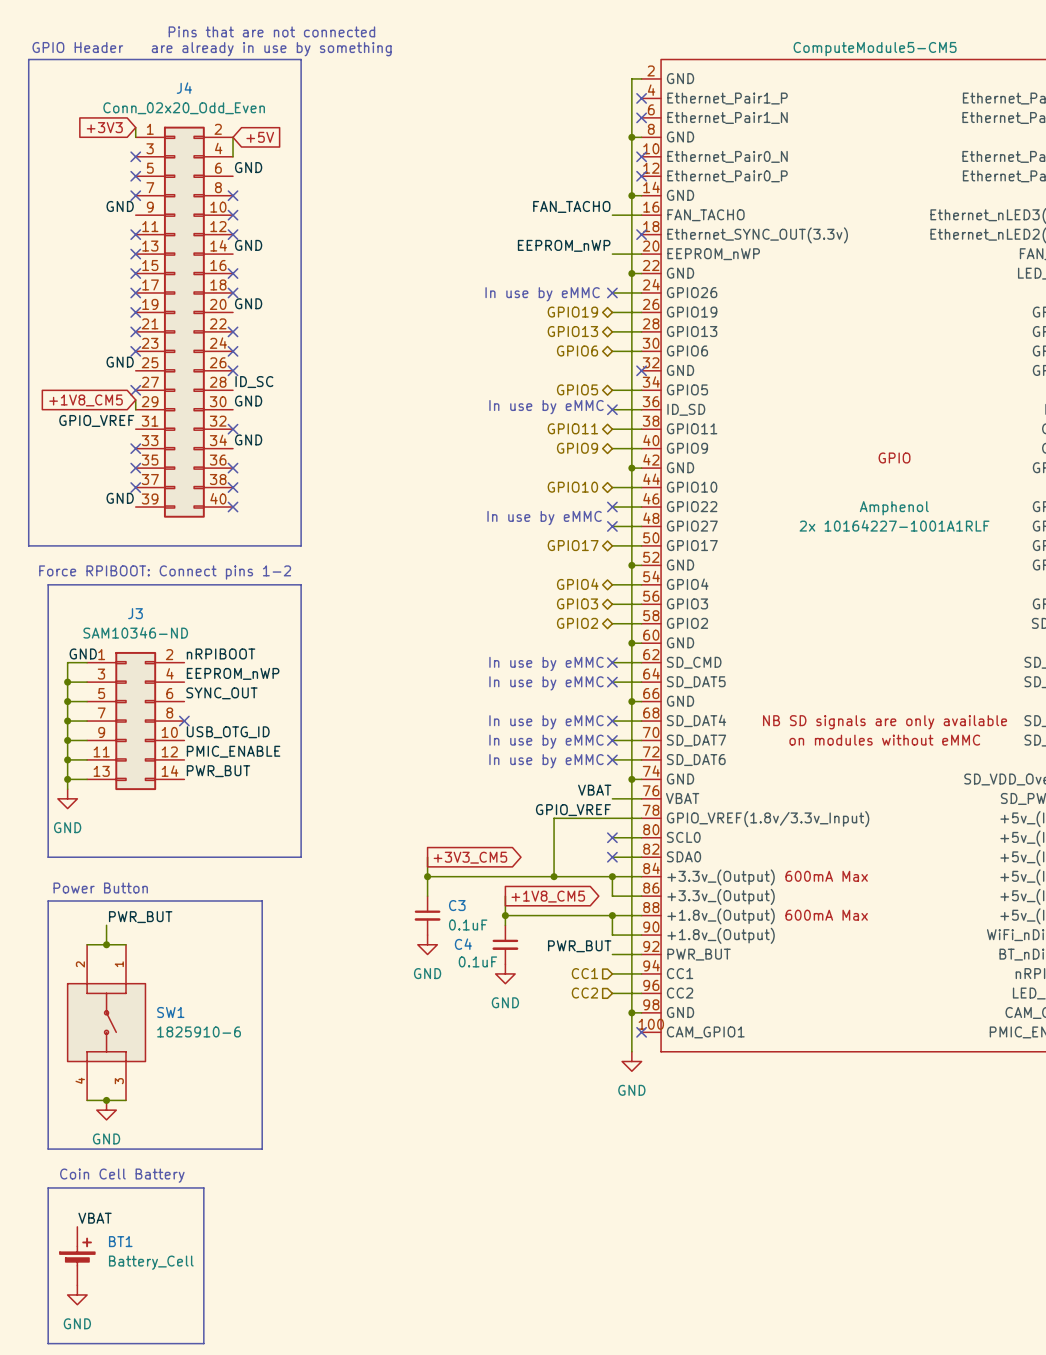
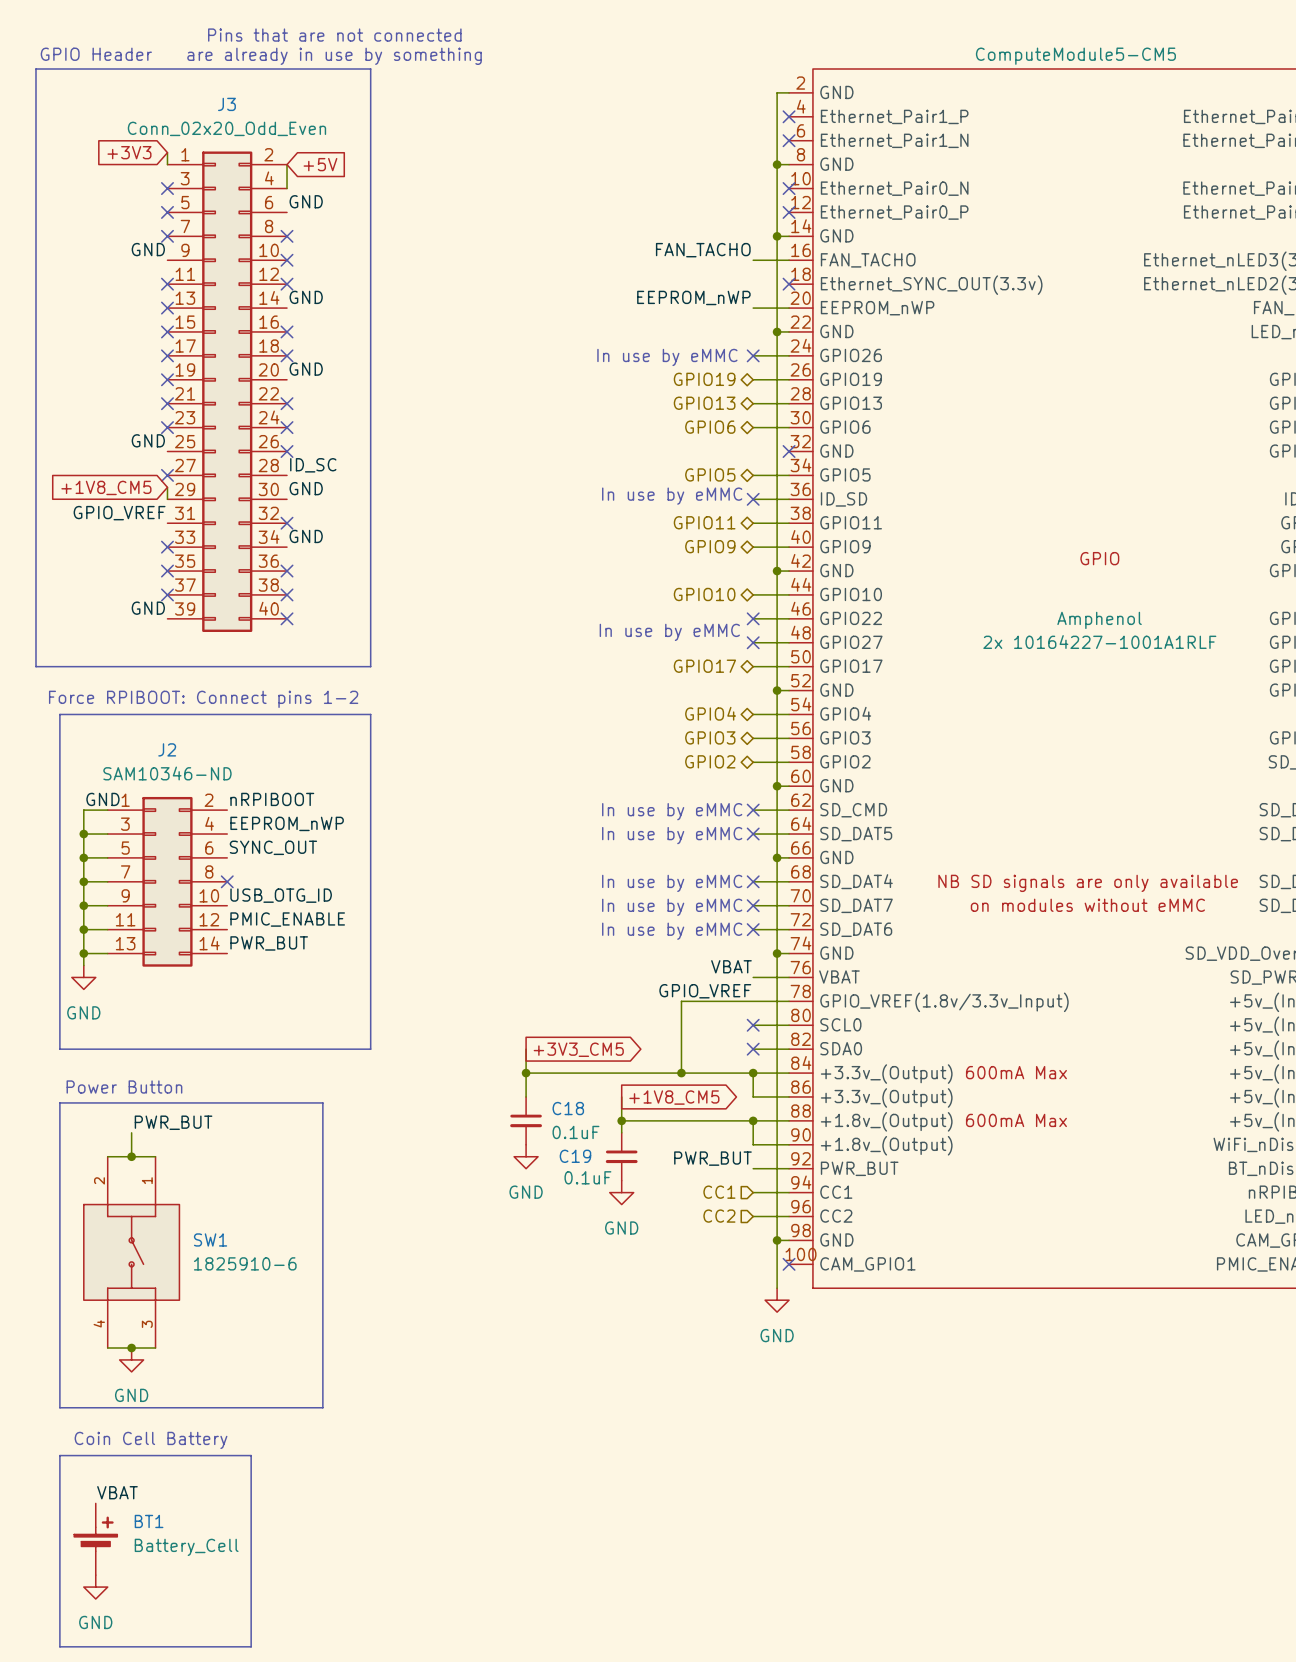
J4 name: J4 (184, 88) -> J3 (226, 104)
J3 name: J3 (135, 613) -> J2 (167, 749)
C3 name: C3 (457, 905) -> C18 (568, 1108)
C4 name: C4 (463, 944) -> C19 (575, 1156)

